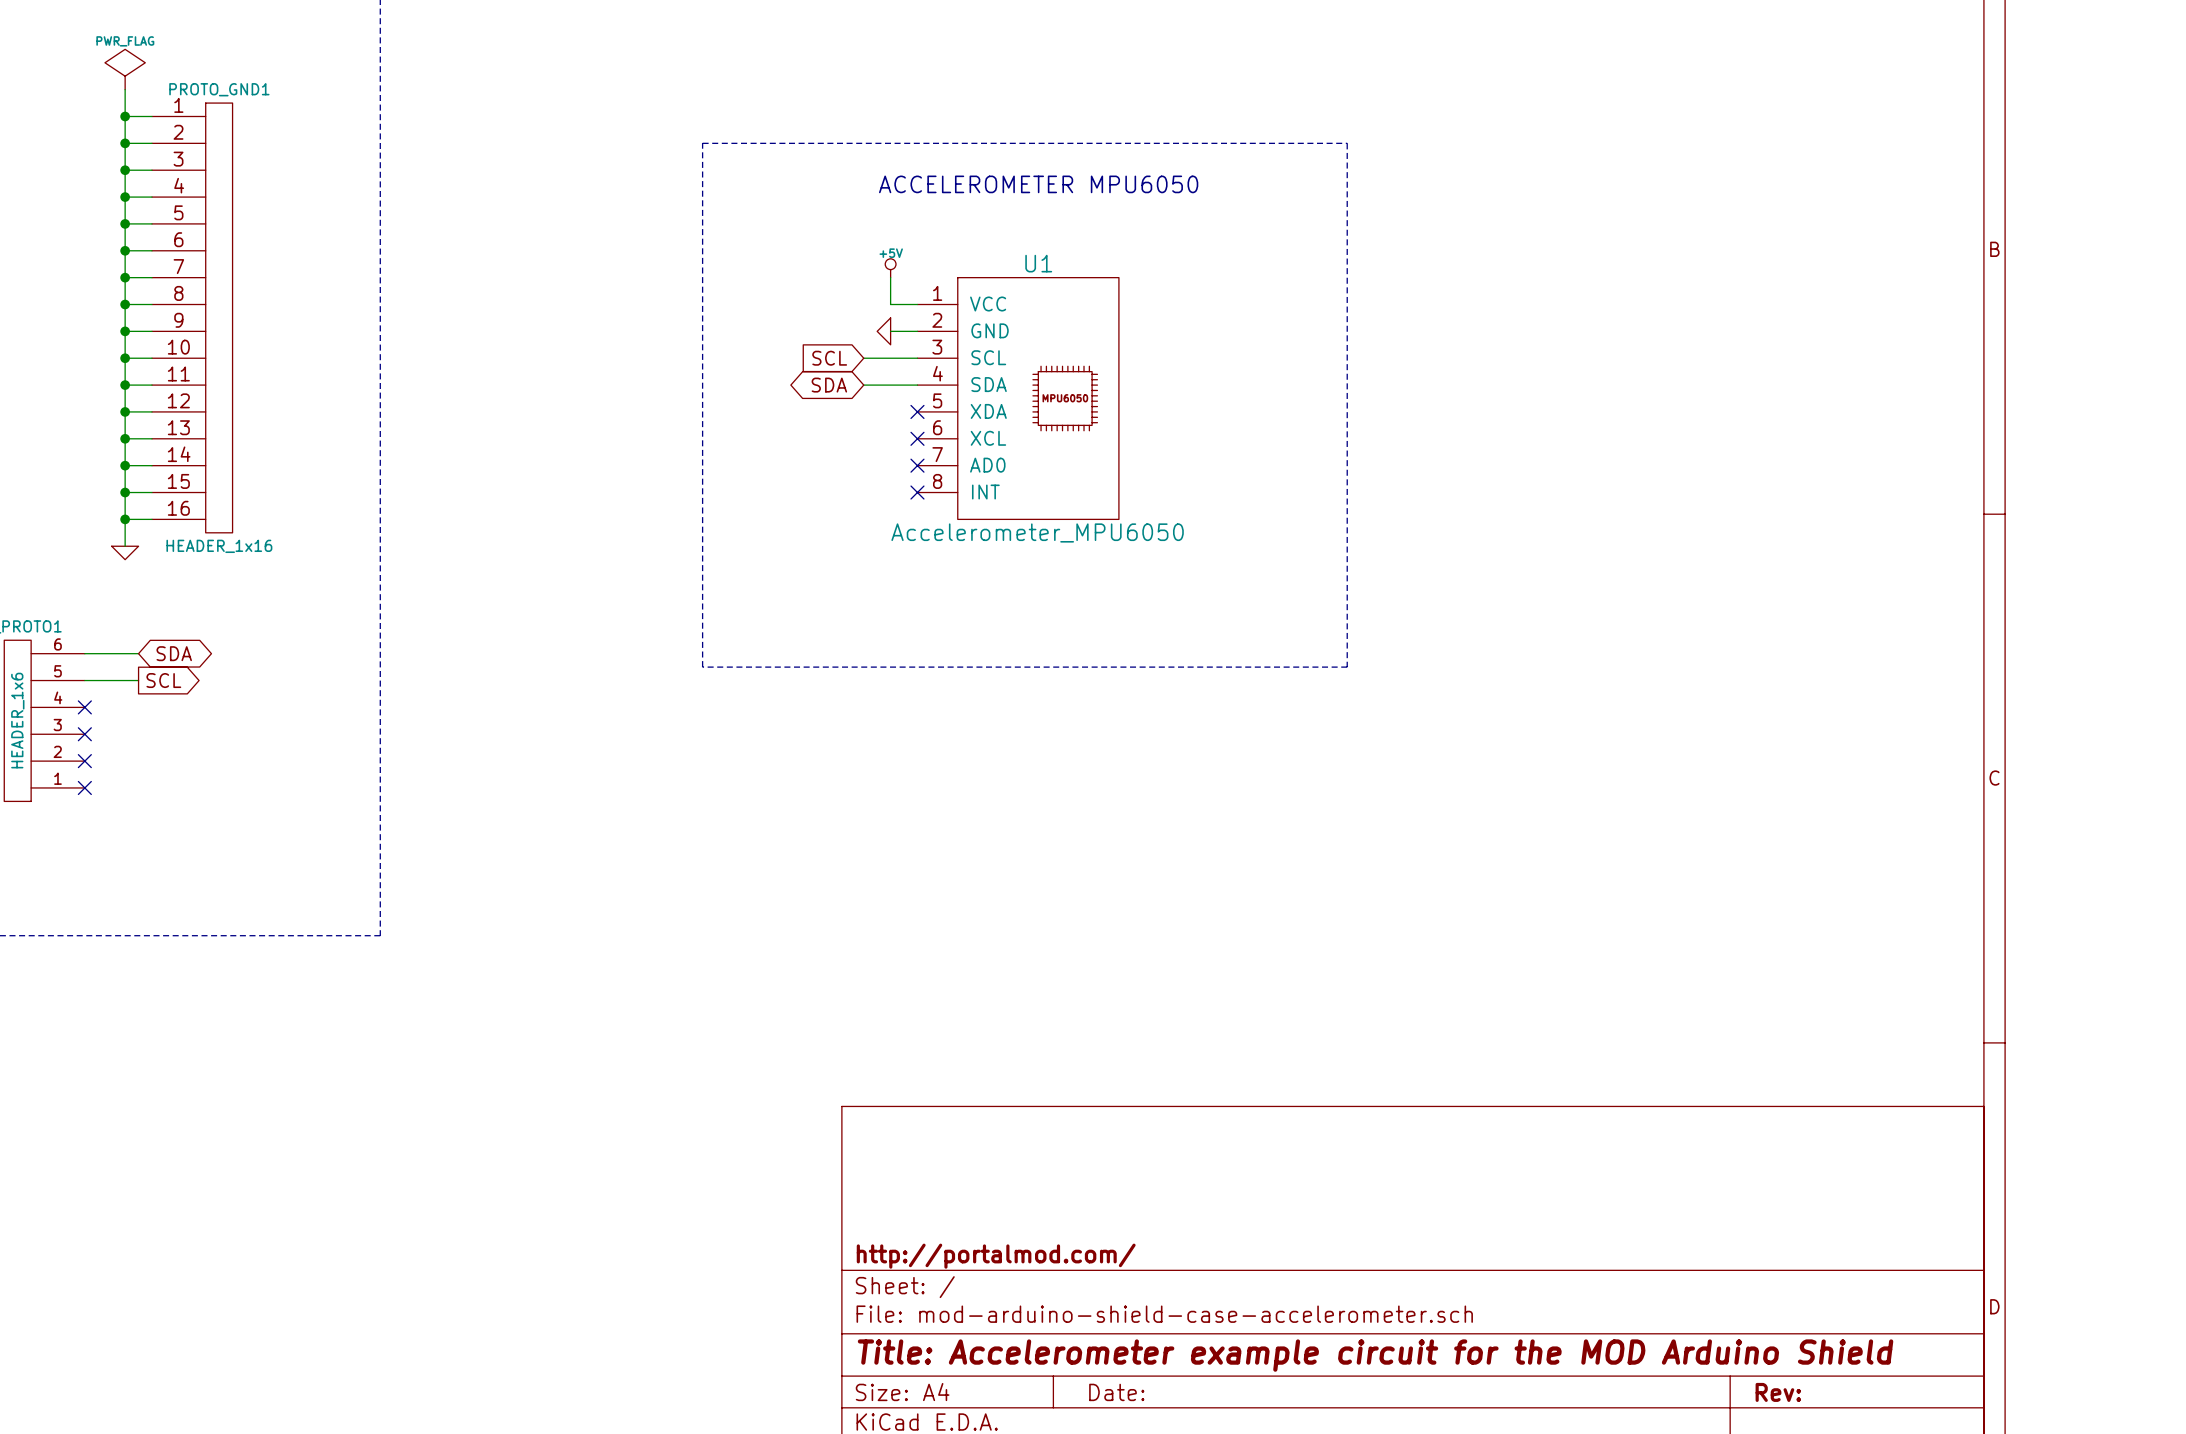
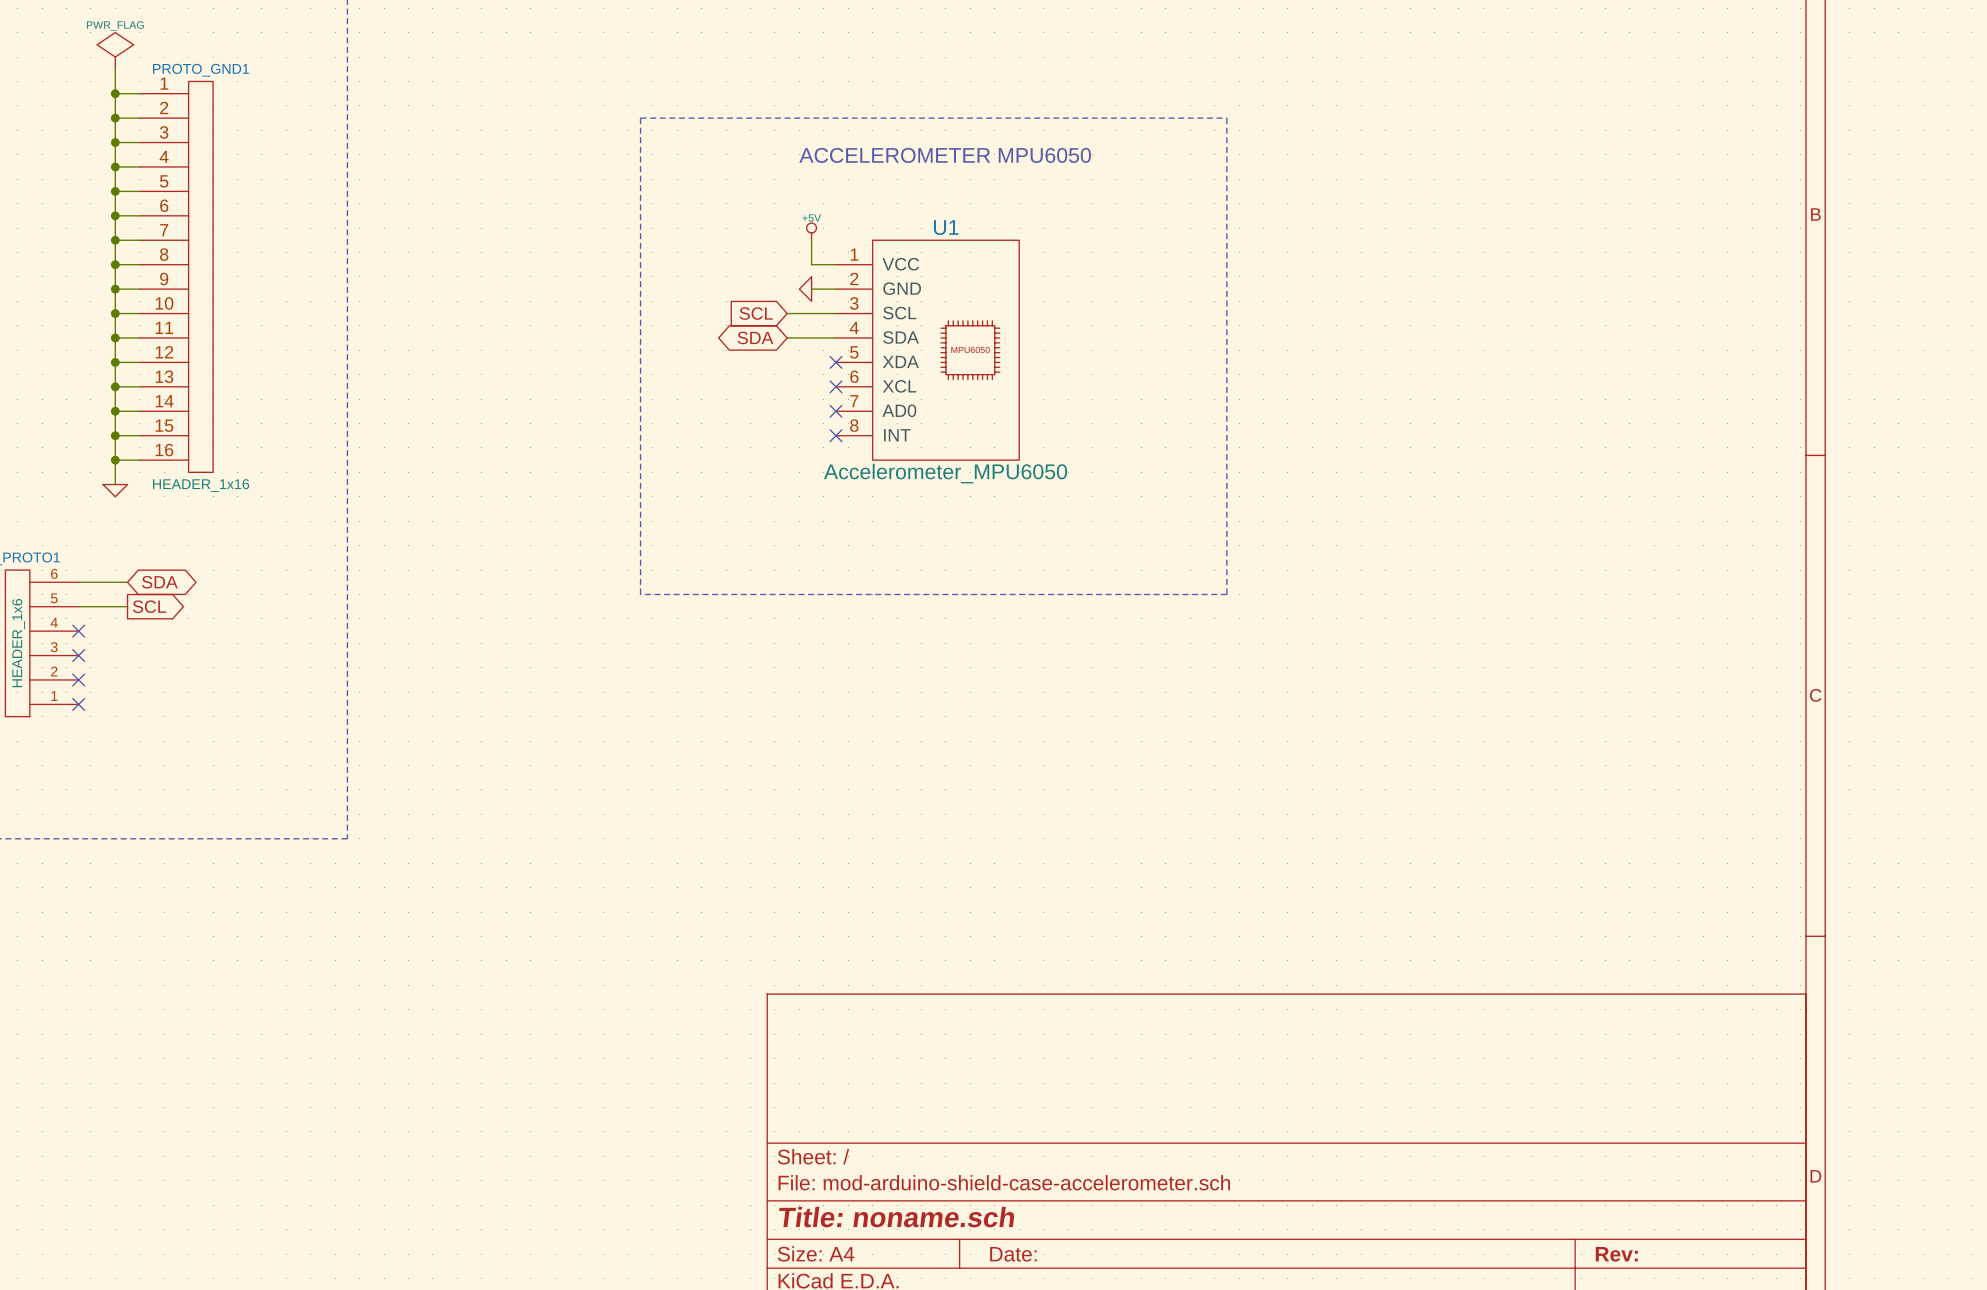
title block: http://portalmod.com/ (996, 1256) -> none
title block: Title: Accelerometer example circuit for the MOD Arduino Shield (1375, 1355) -> Title: noname.sch (896, 1217)

